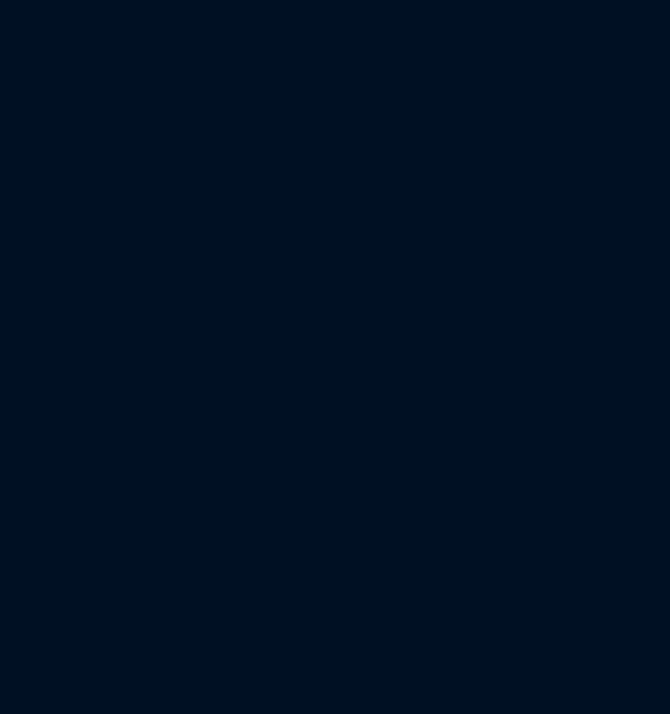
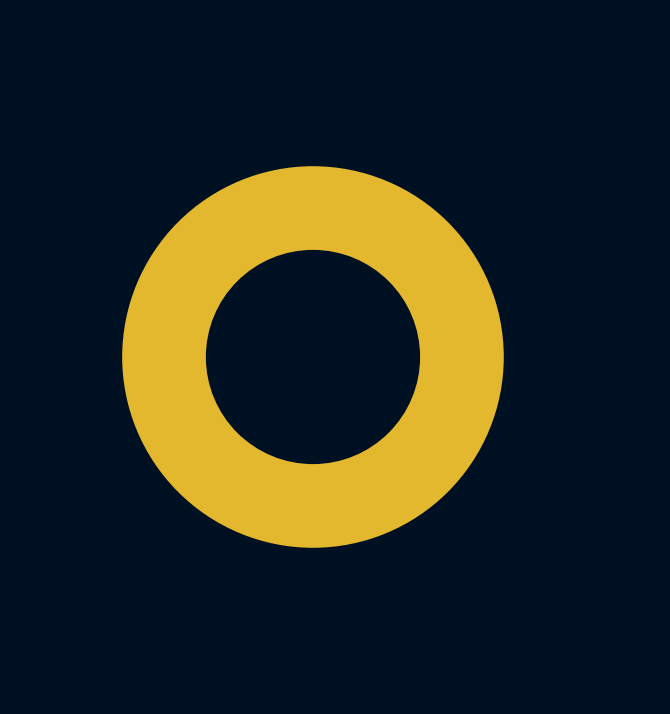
part: none -> (312, 356)

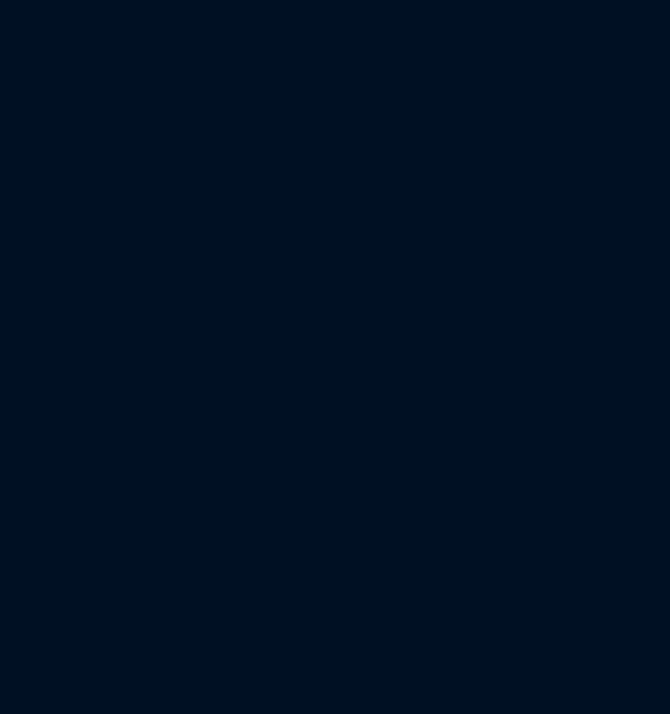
part: (312, 356) -> none

